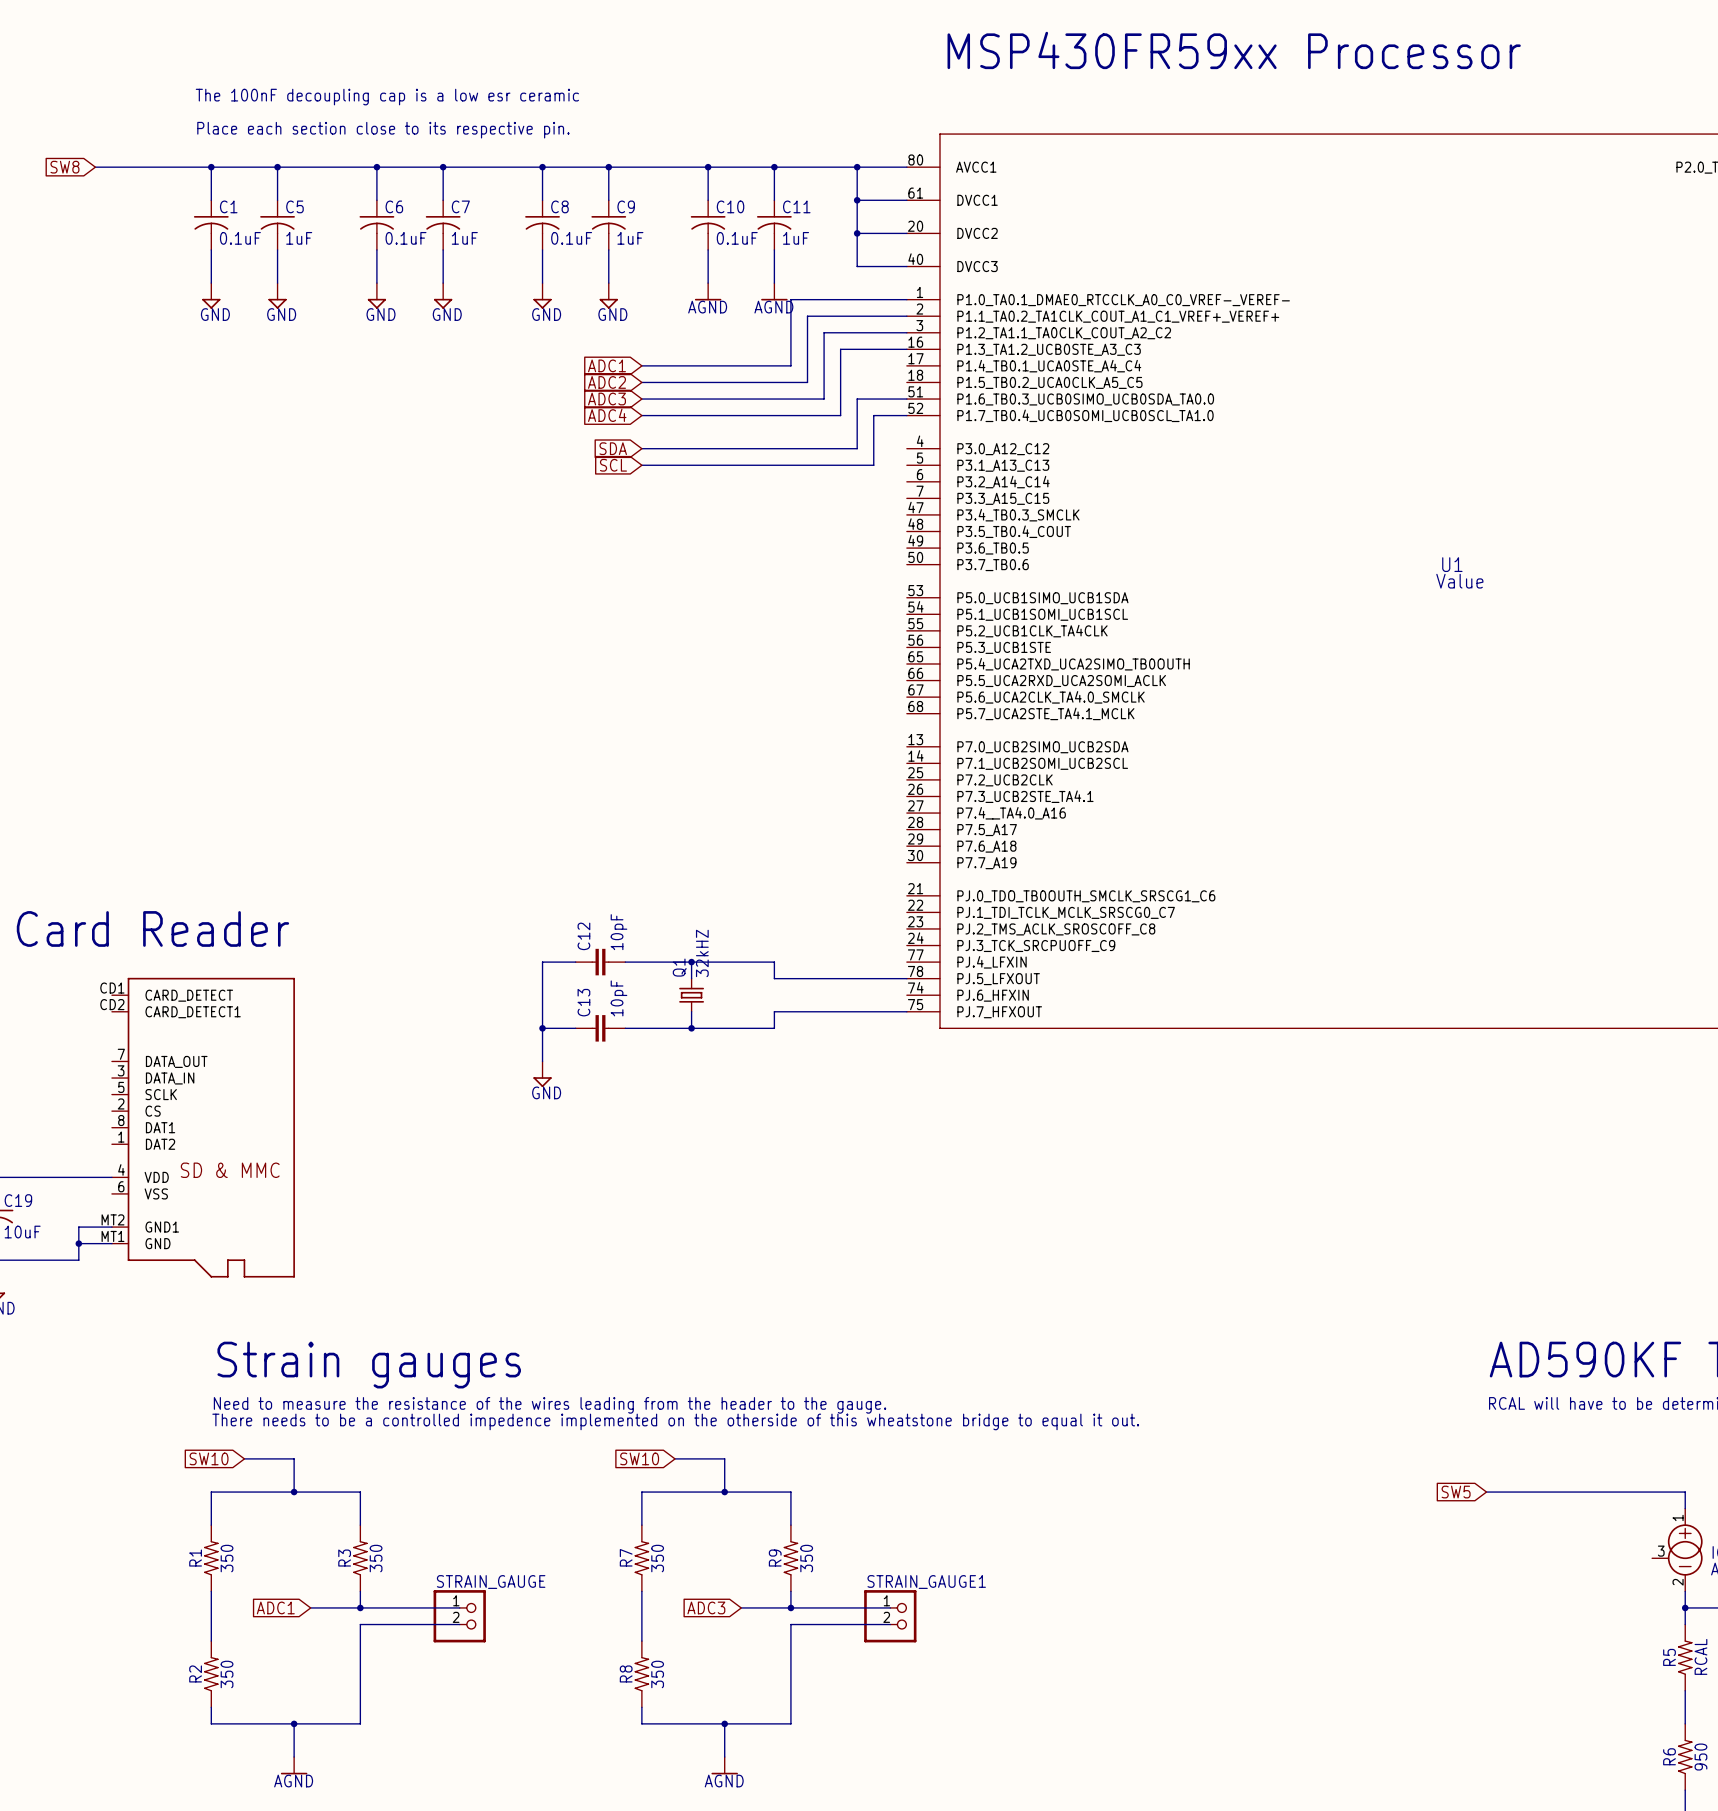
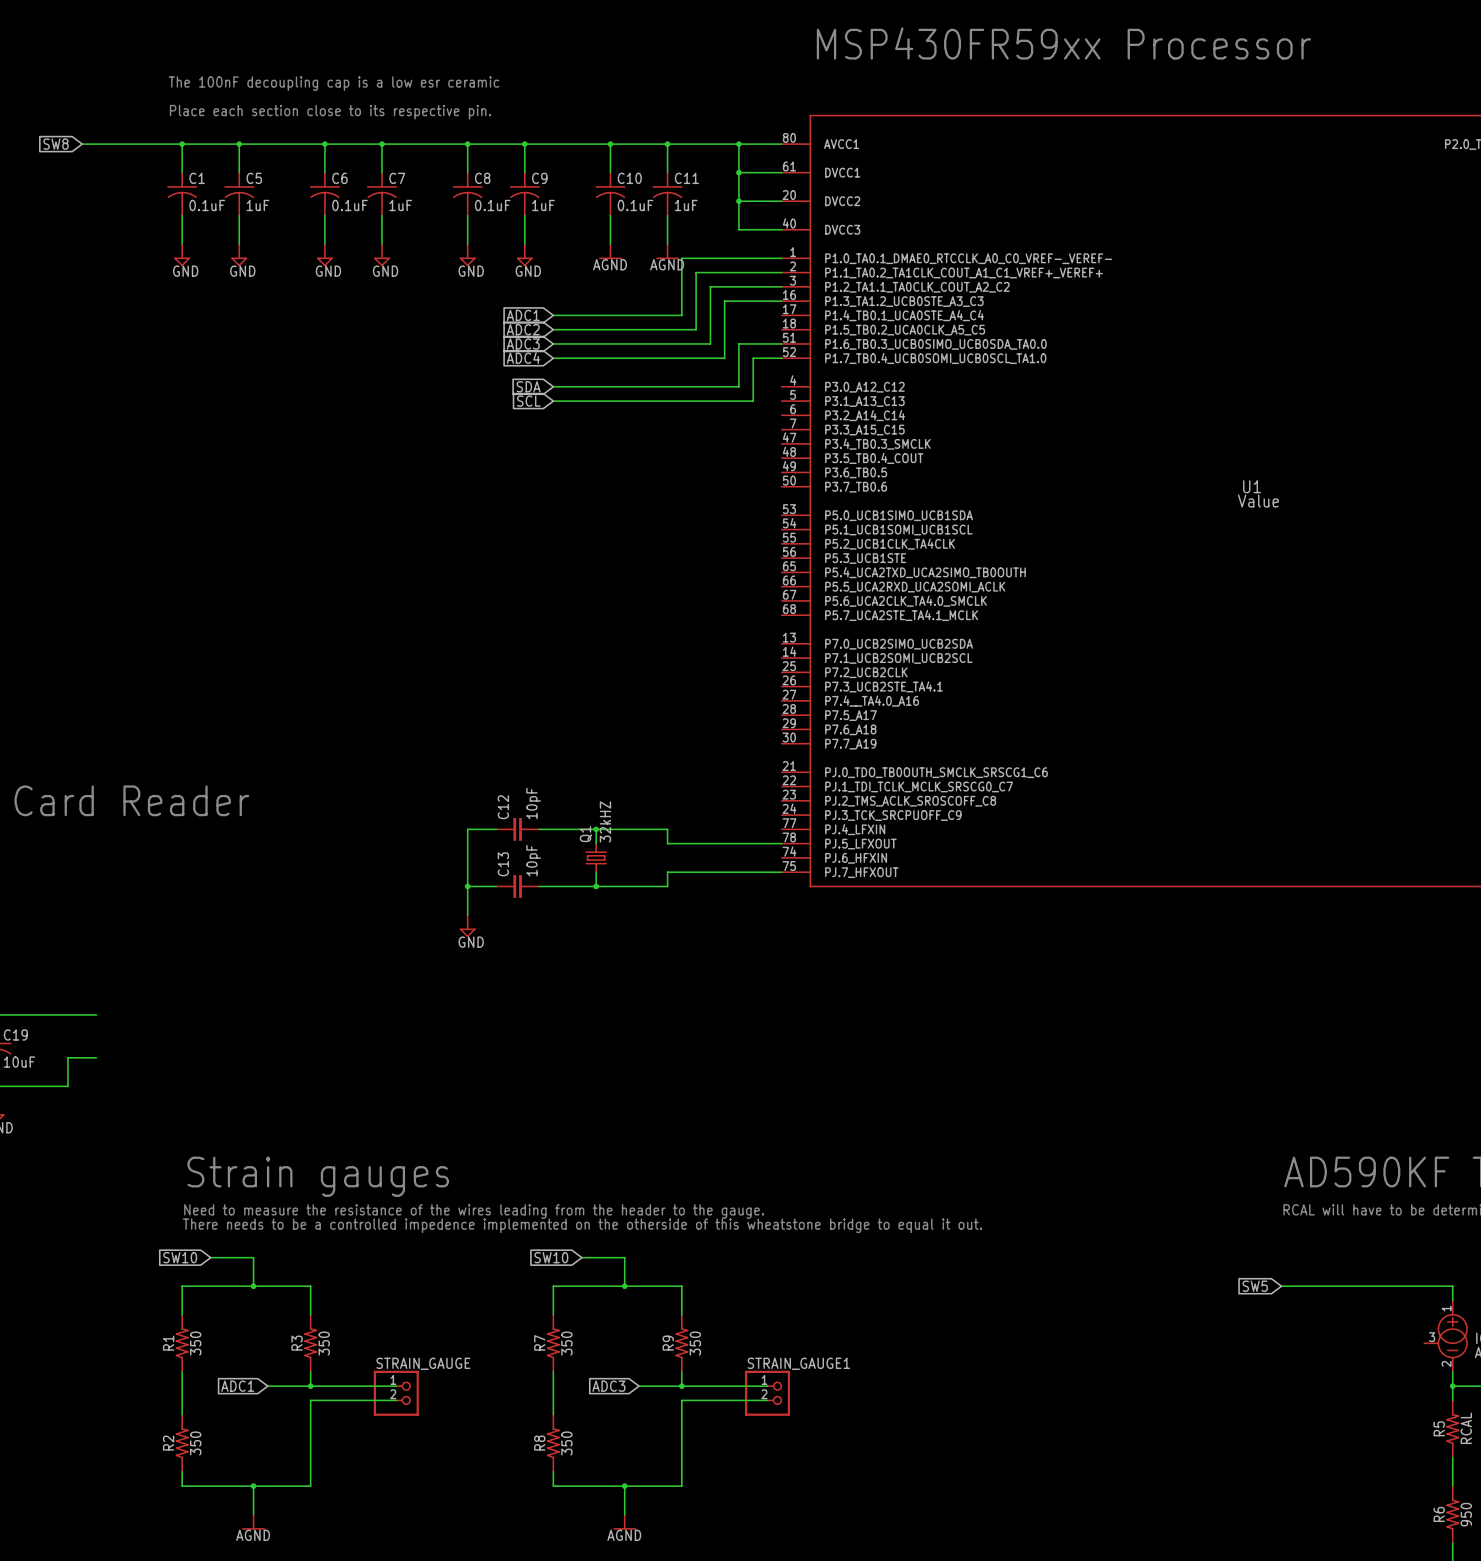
part: (203, 1127) -> none
wire: (78, 1243) (111, 1243) -> none
junction: (78, 1243) -> none

